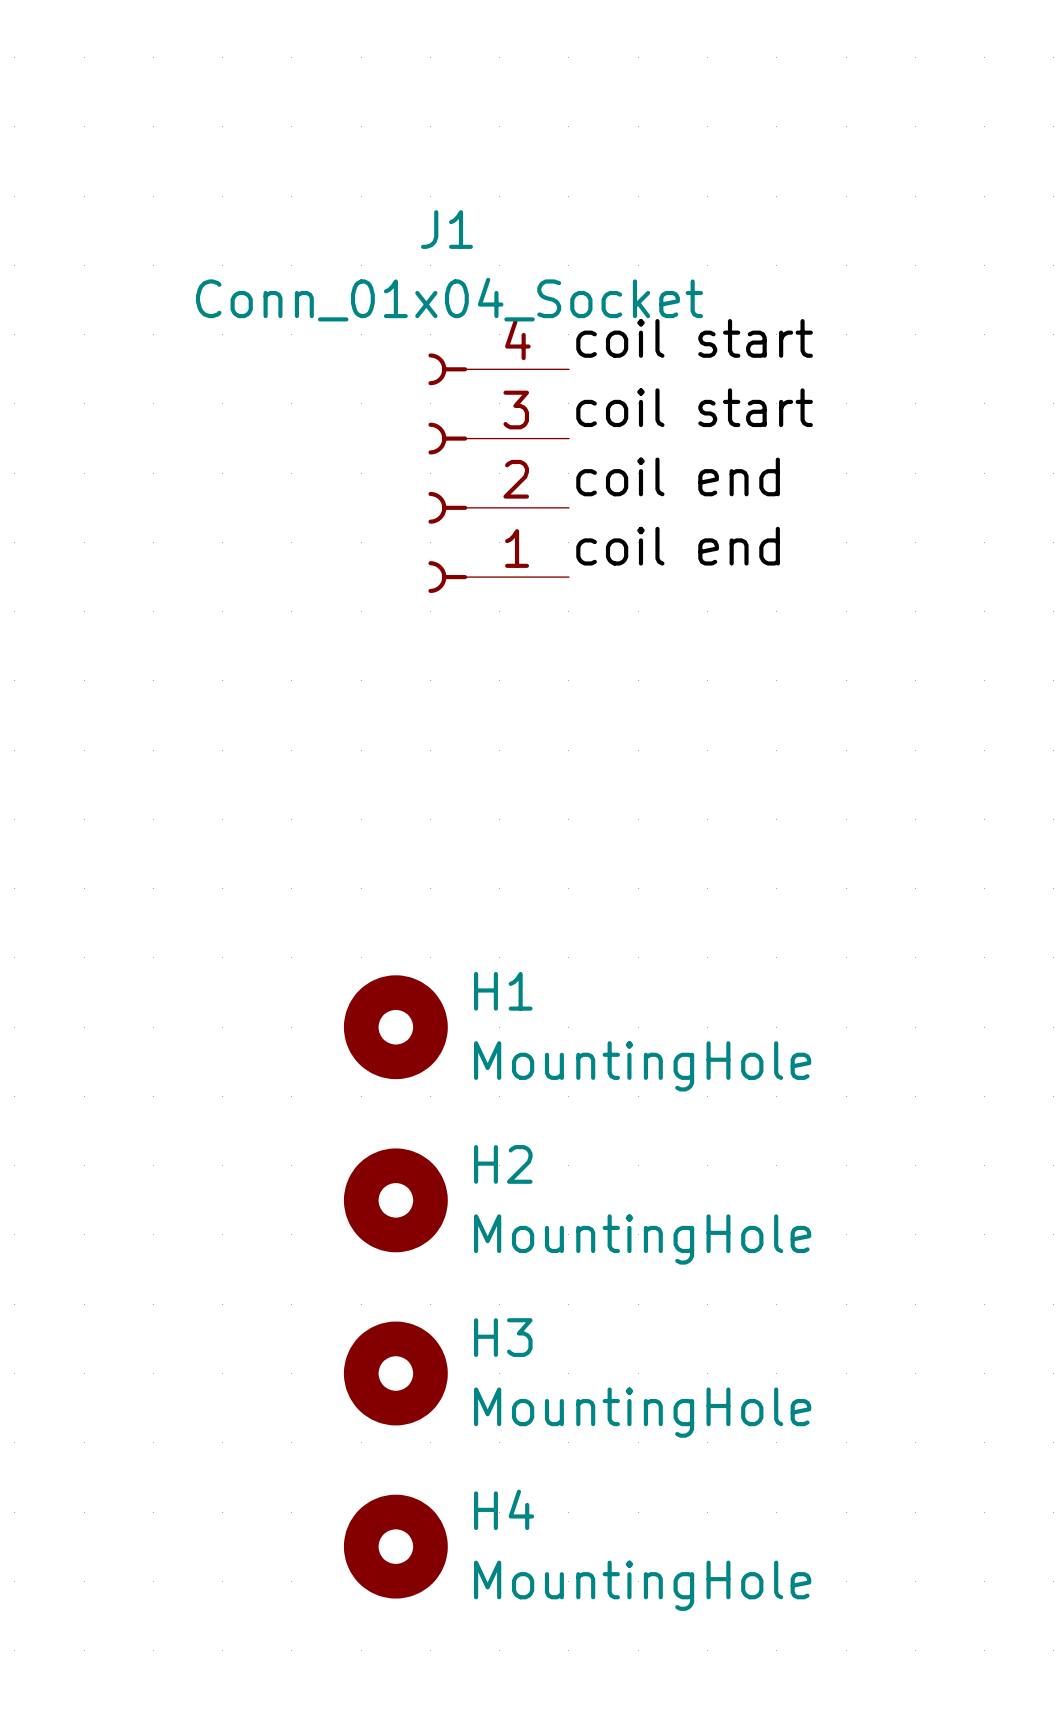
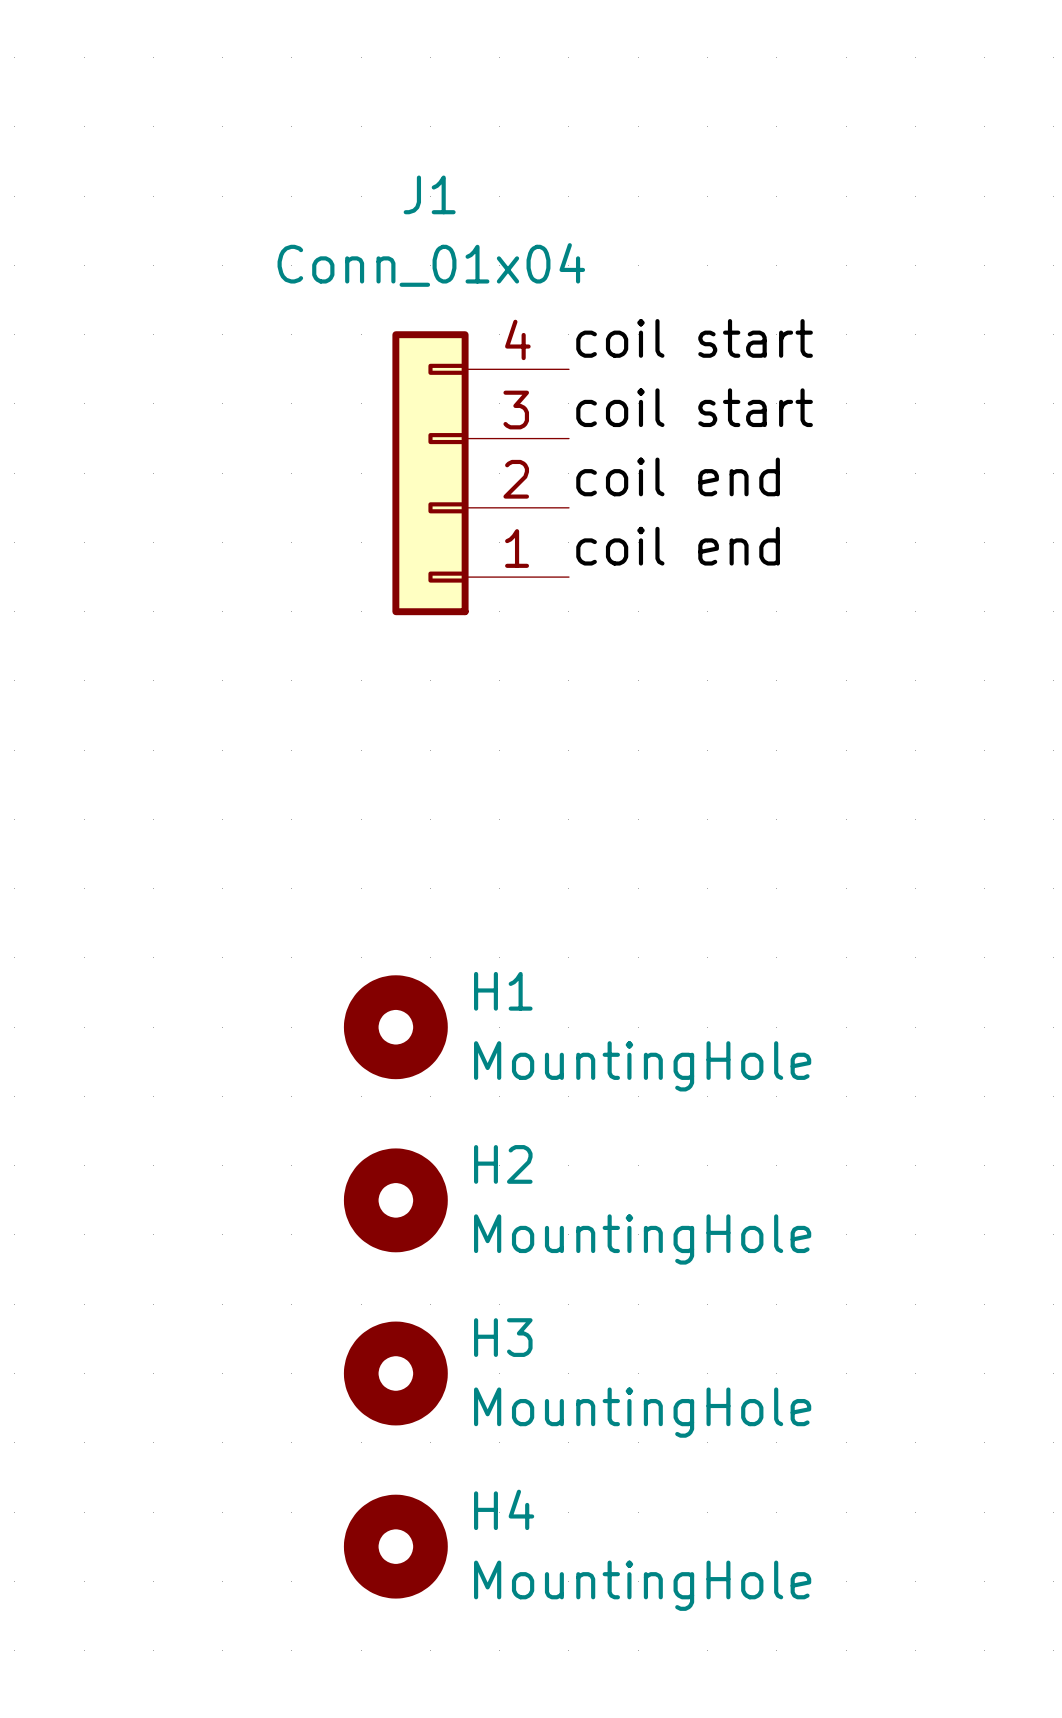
J1 value: Conn_01x04_Socket (449, 299) -> Conn_01x04 (431, 264)
J1 symbol: [428, 353, 569, 594] -> [392, 331, 569, 616]

